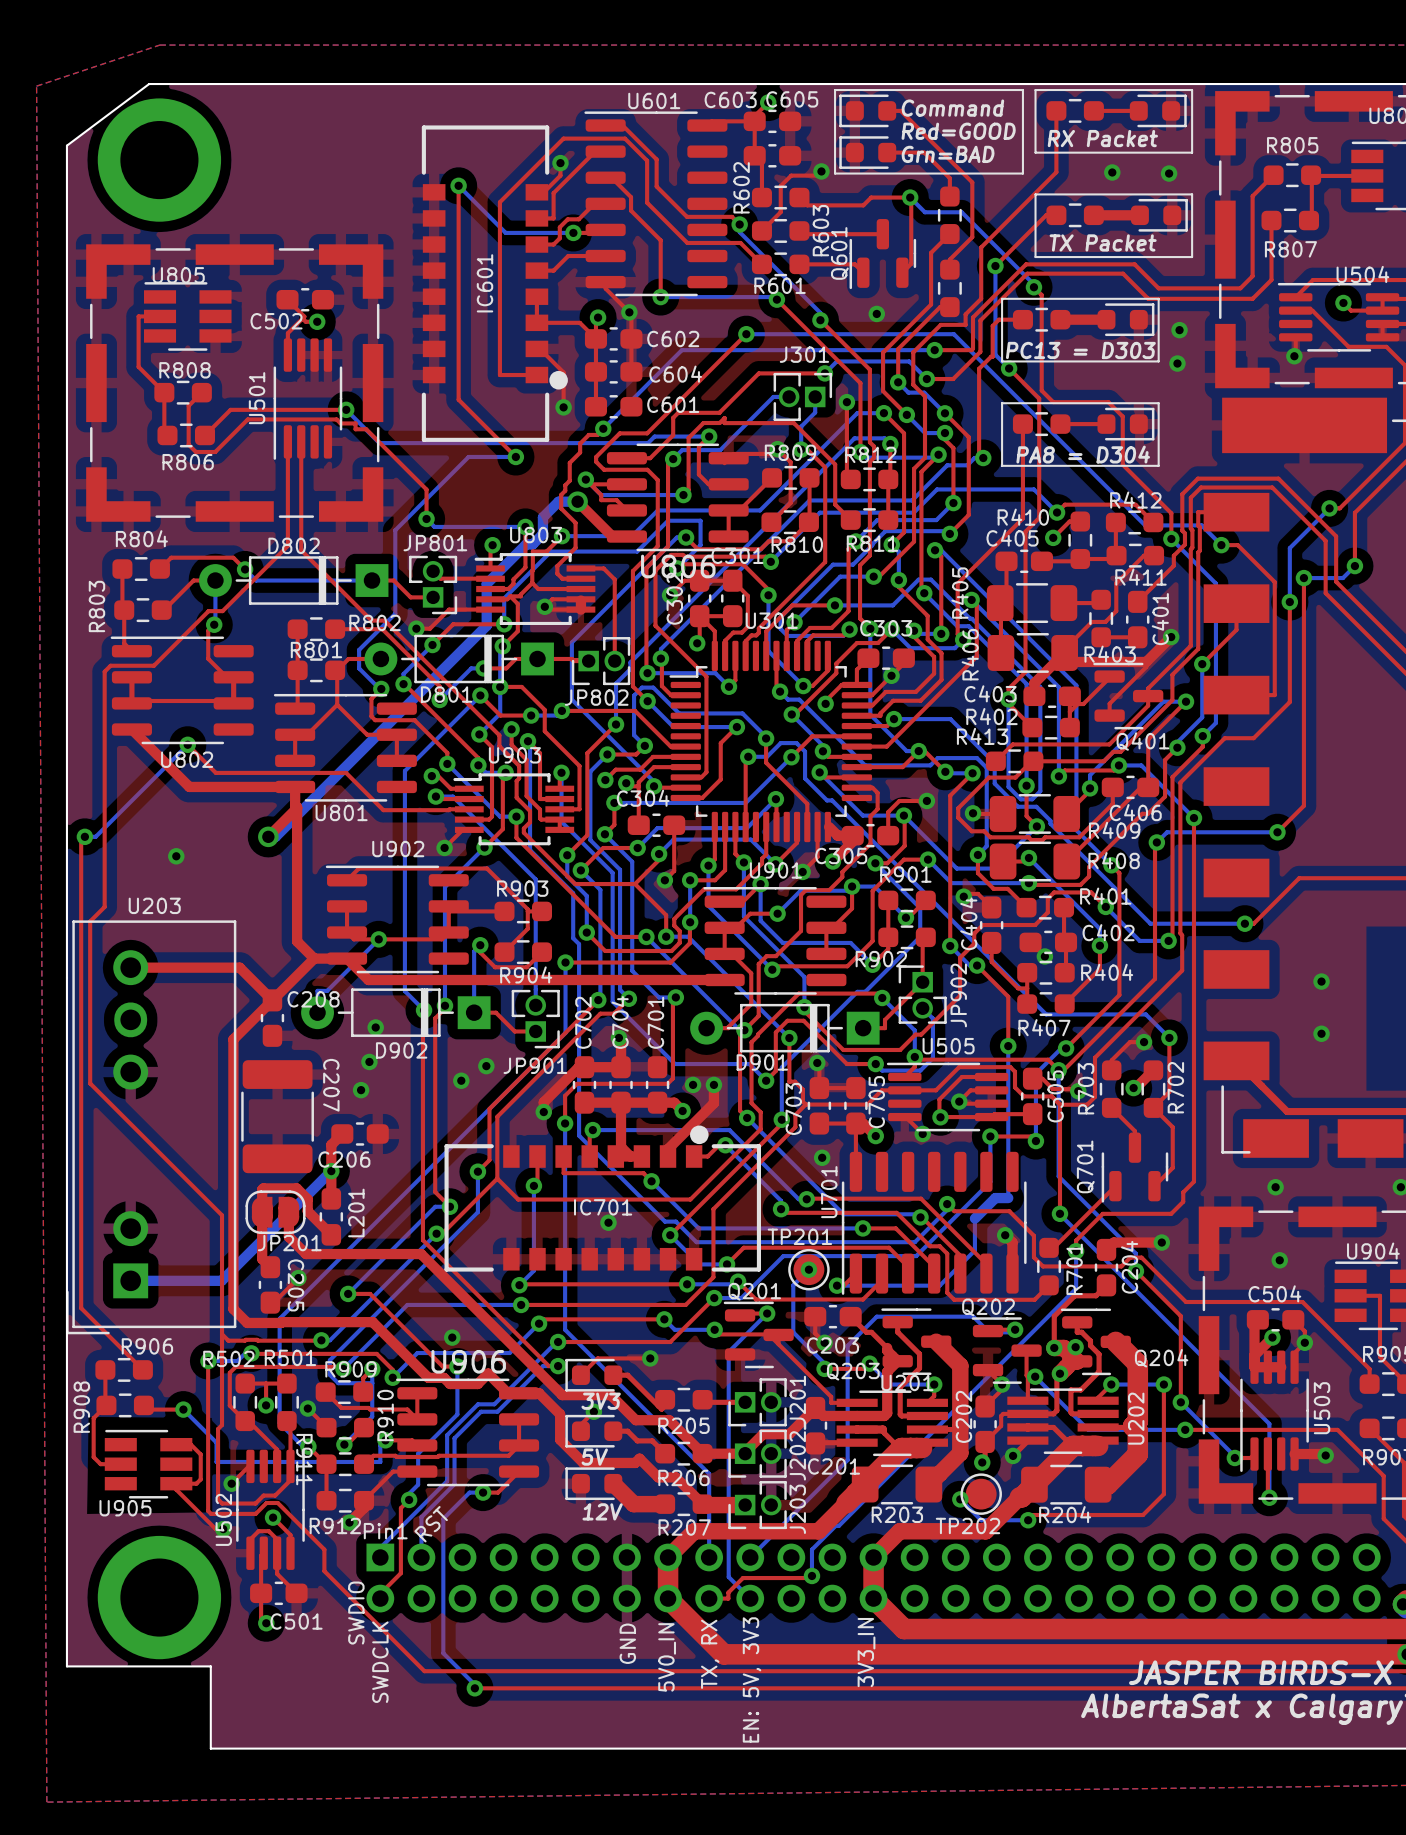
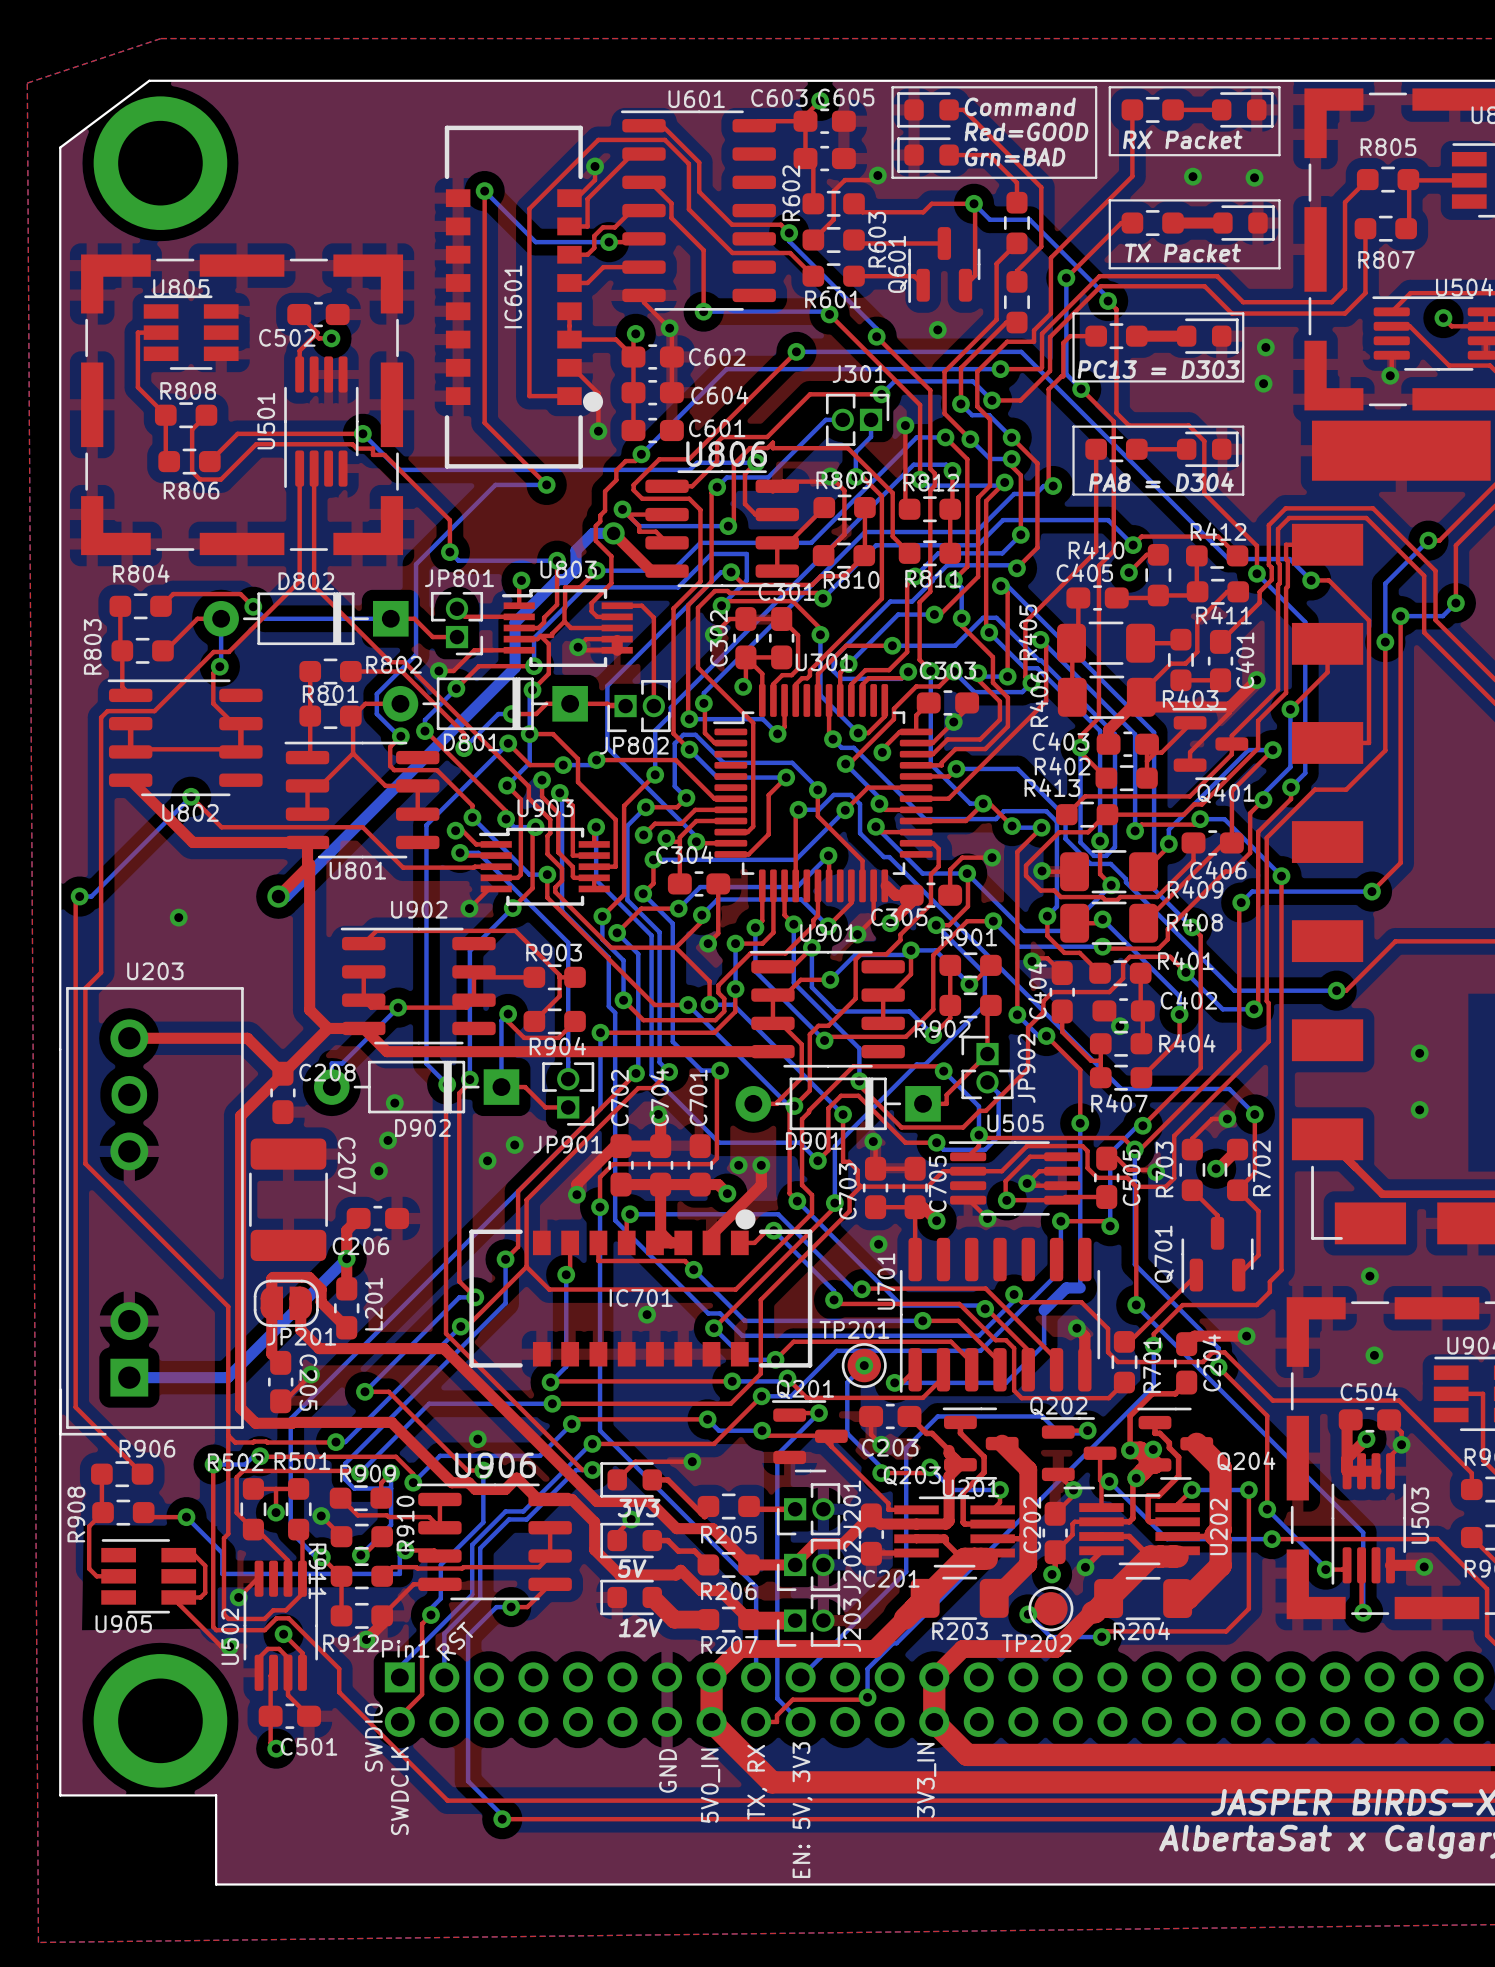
U806 name position: U806 (678, 566) -> U806 (726, 454)

